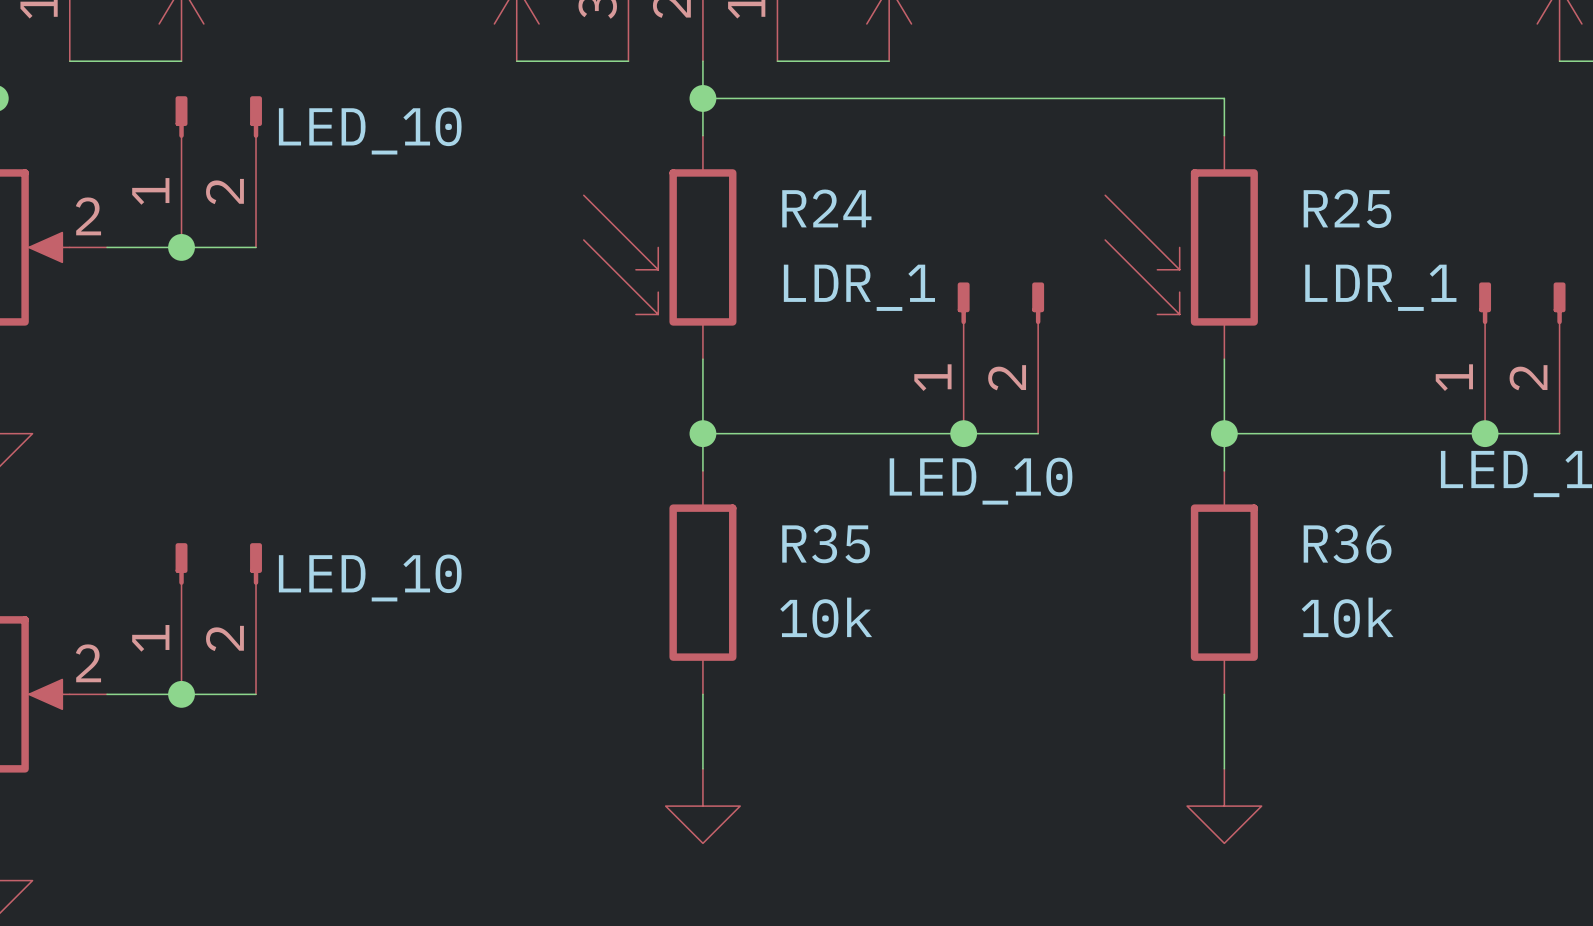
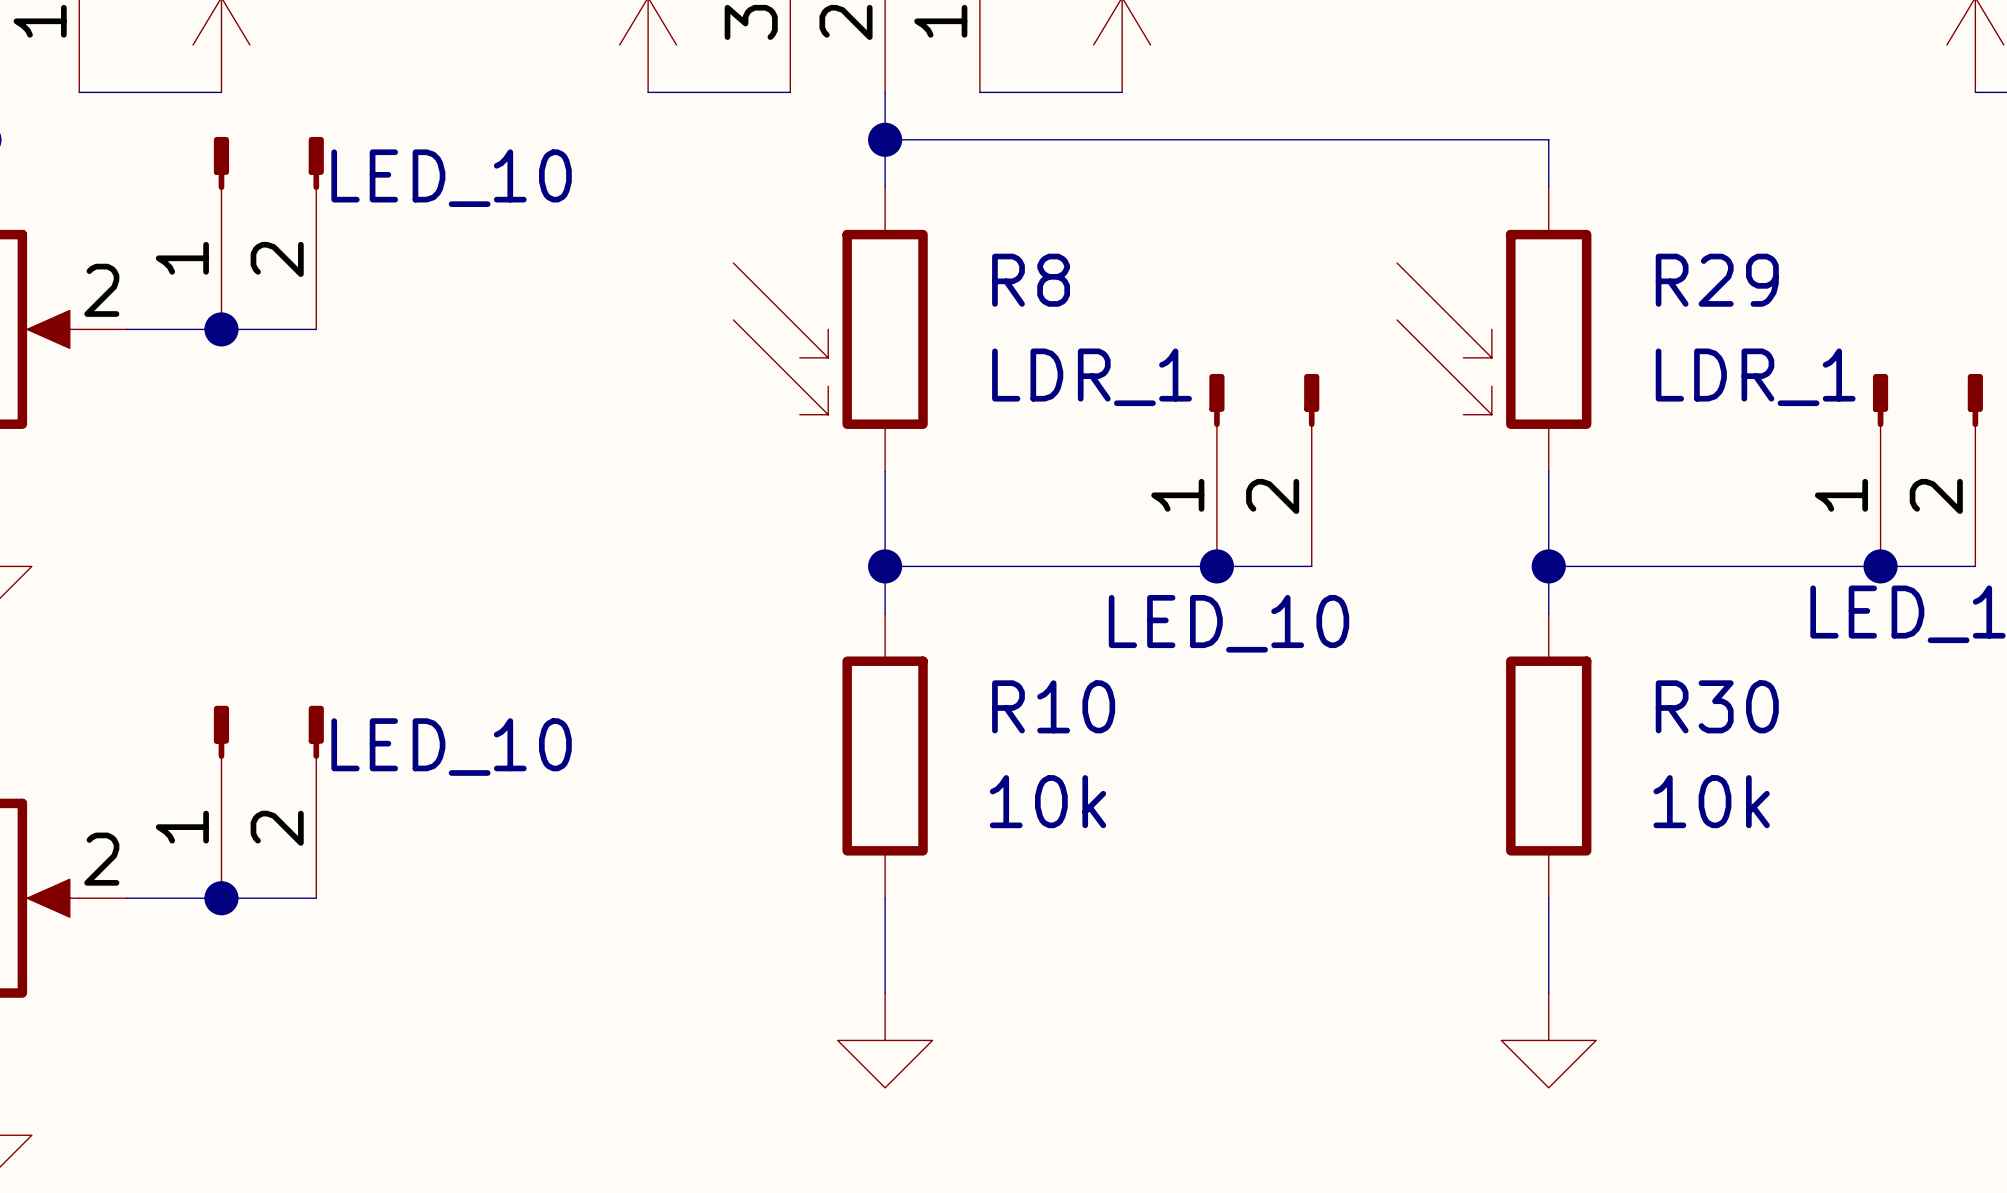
R24 name: R24 (826, 208) -> R8 (1031, 280)
R25 name: R25 (1347, 208) -> R29 (1717, 280)
R35 name: R35 (826, 543) -> R10 (1053, 706)
R36 name: R36 (1347, 543) -> R30 (1717, 706)

